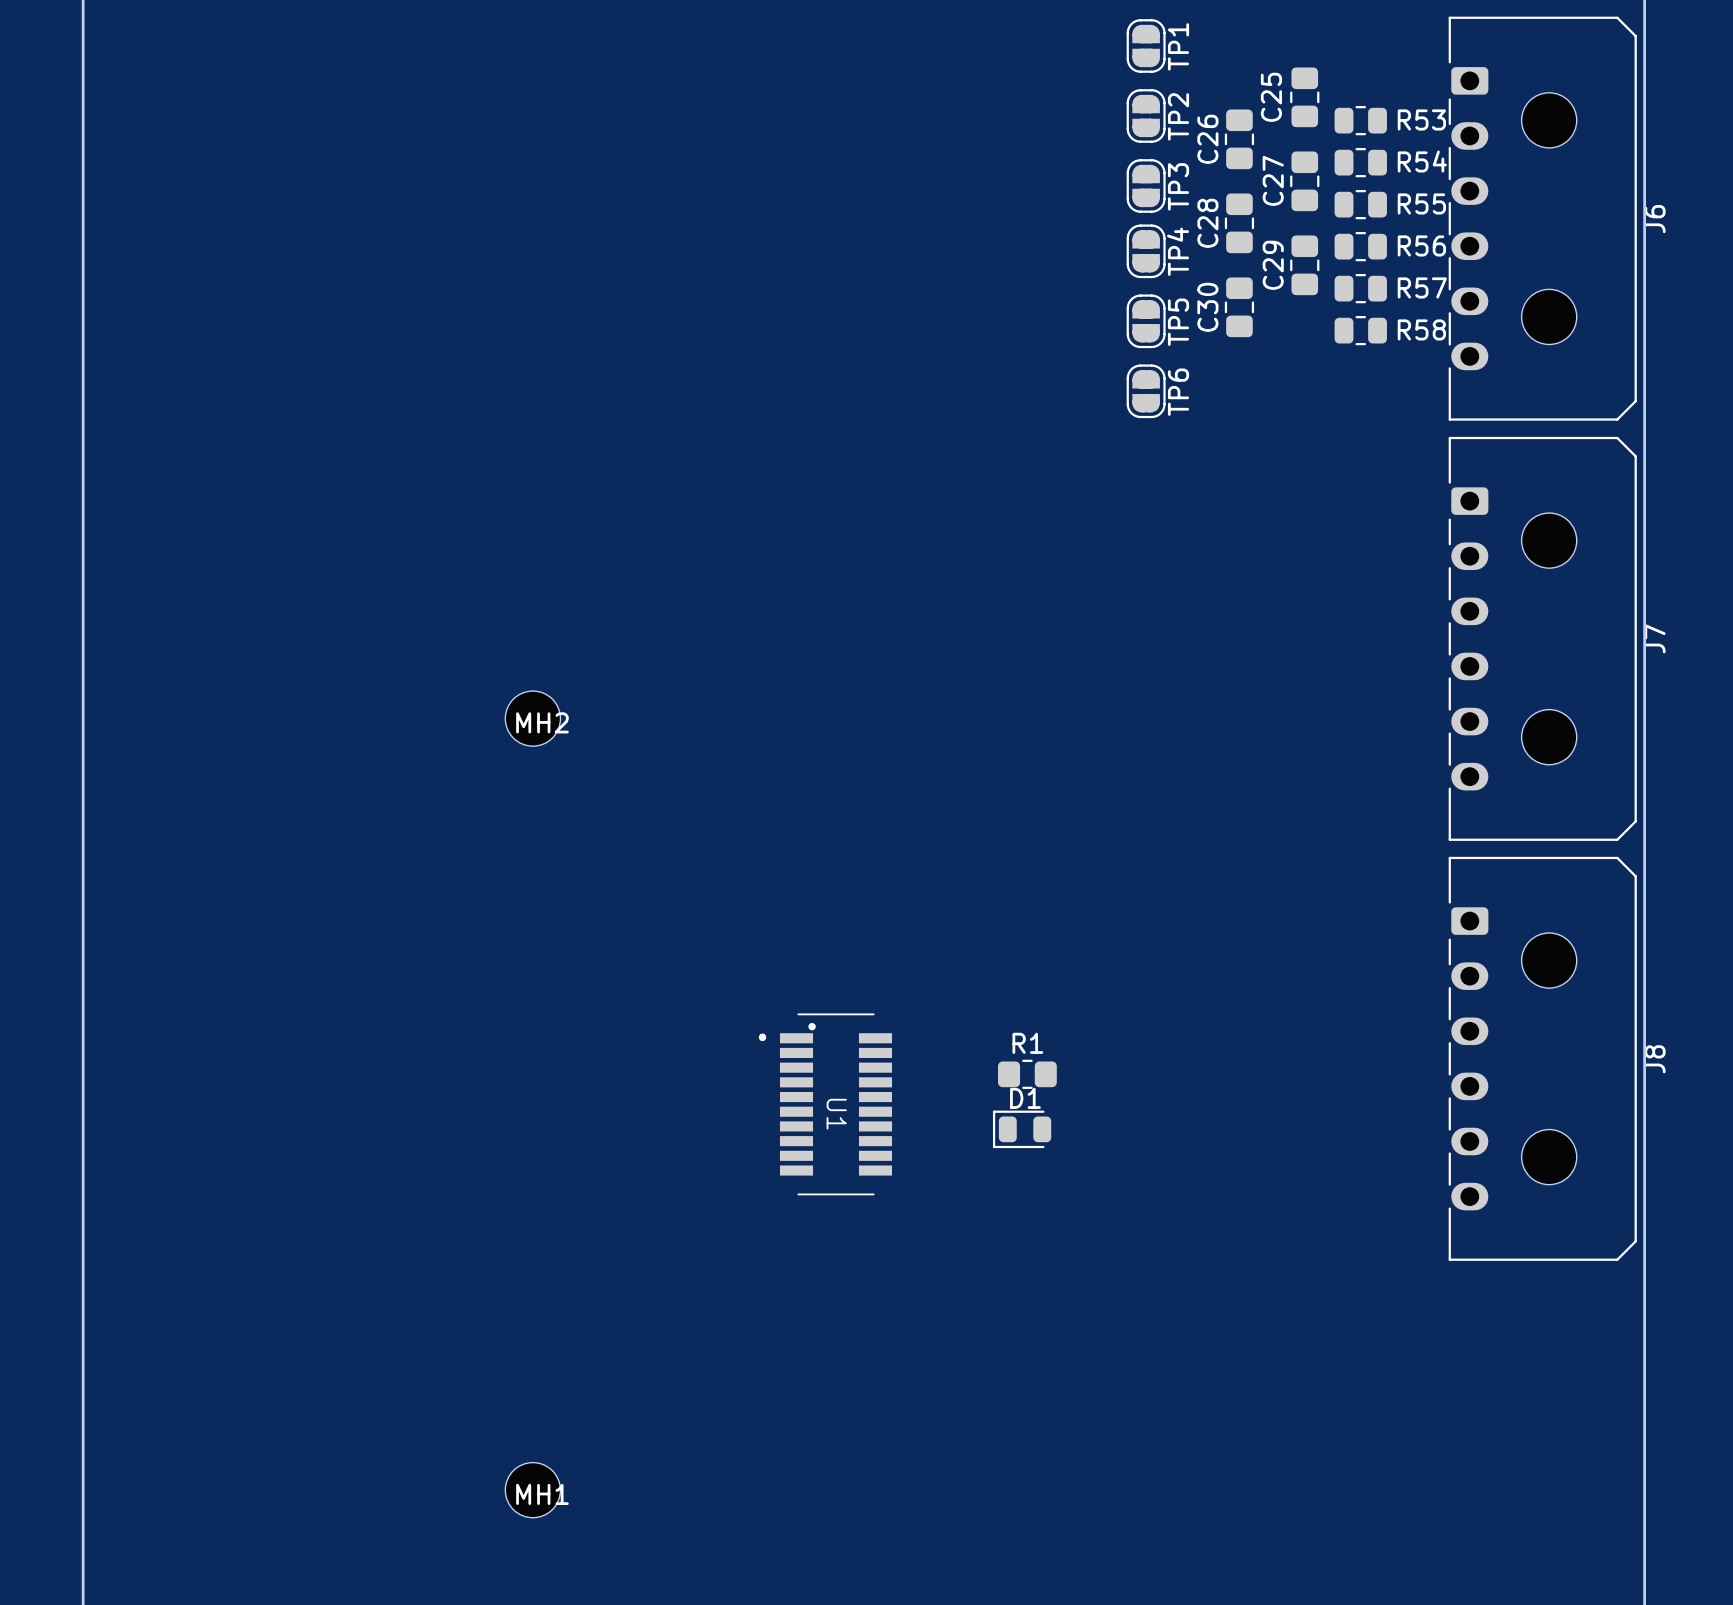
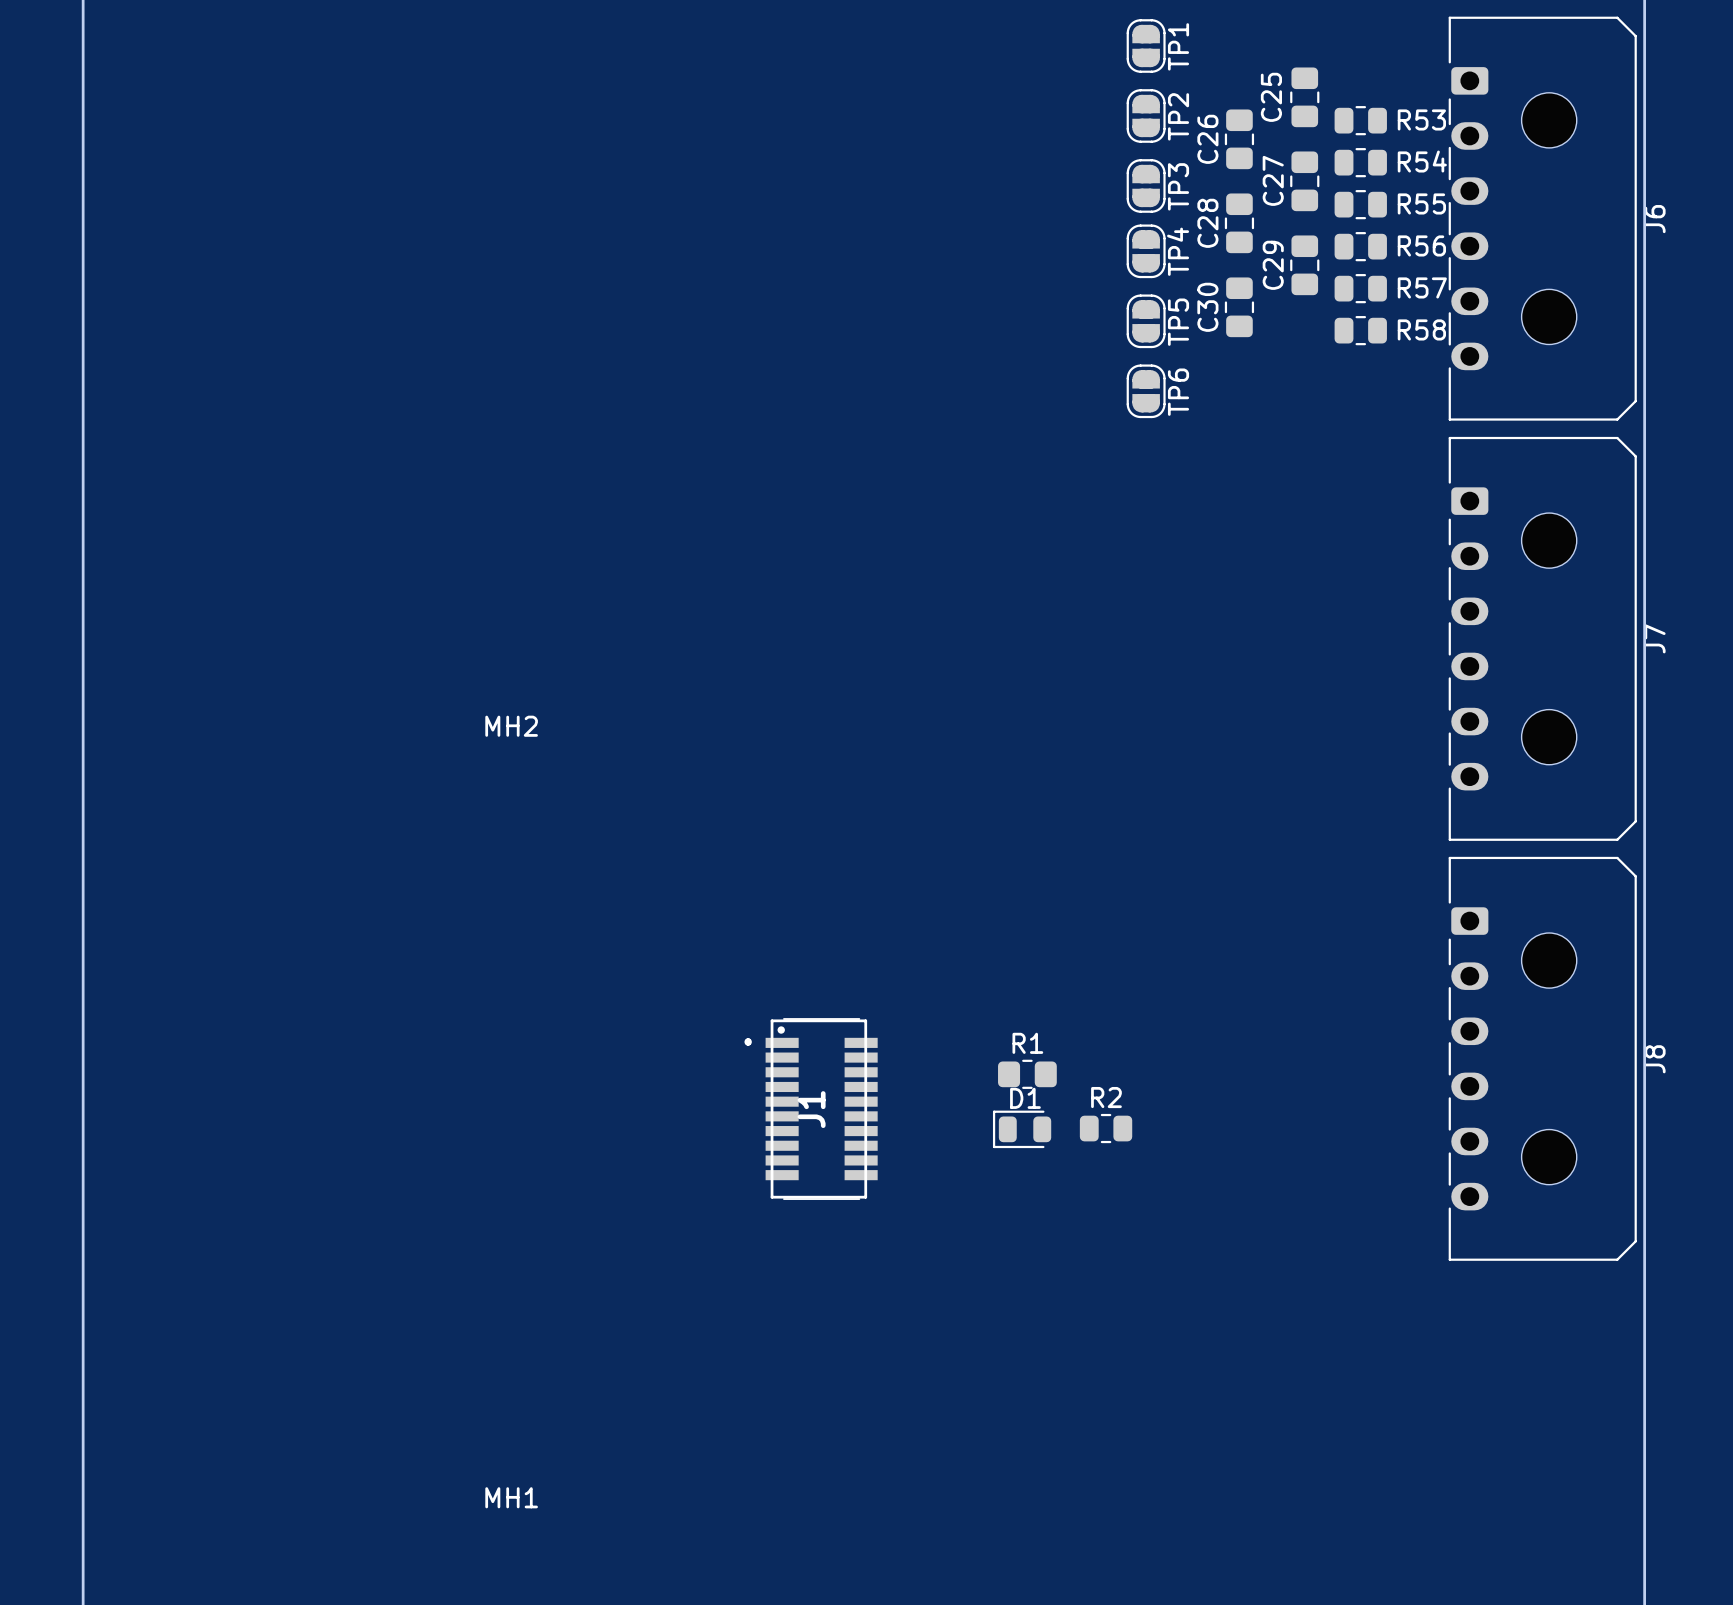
text position: MH2 (542, 722) -> MH2 (511, 726)
line: none -> (772, 1020) (865, 1020) (865, 1197) (772, 1197) (772, 1020)
drawing position: (812, 1026) -> (781, 1030)
U1: (698, 1104) -> none
J1: none -> (811, 1109)
R2: none -> (1106, 1128)
text position: MH1 (542, 1494) -> MH1 (511, 1497)

